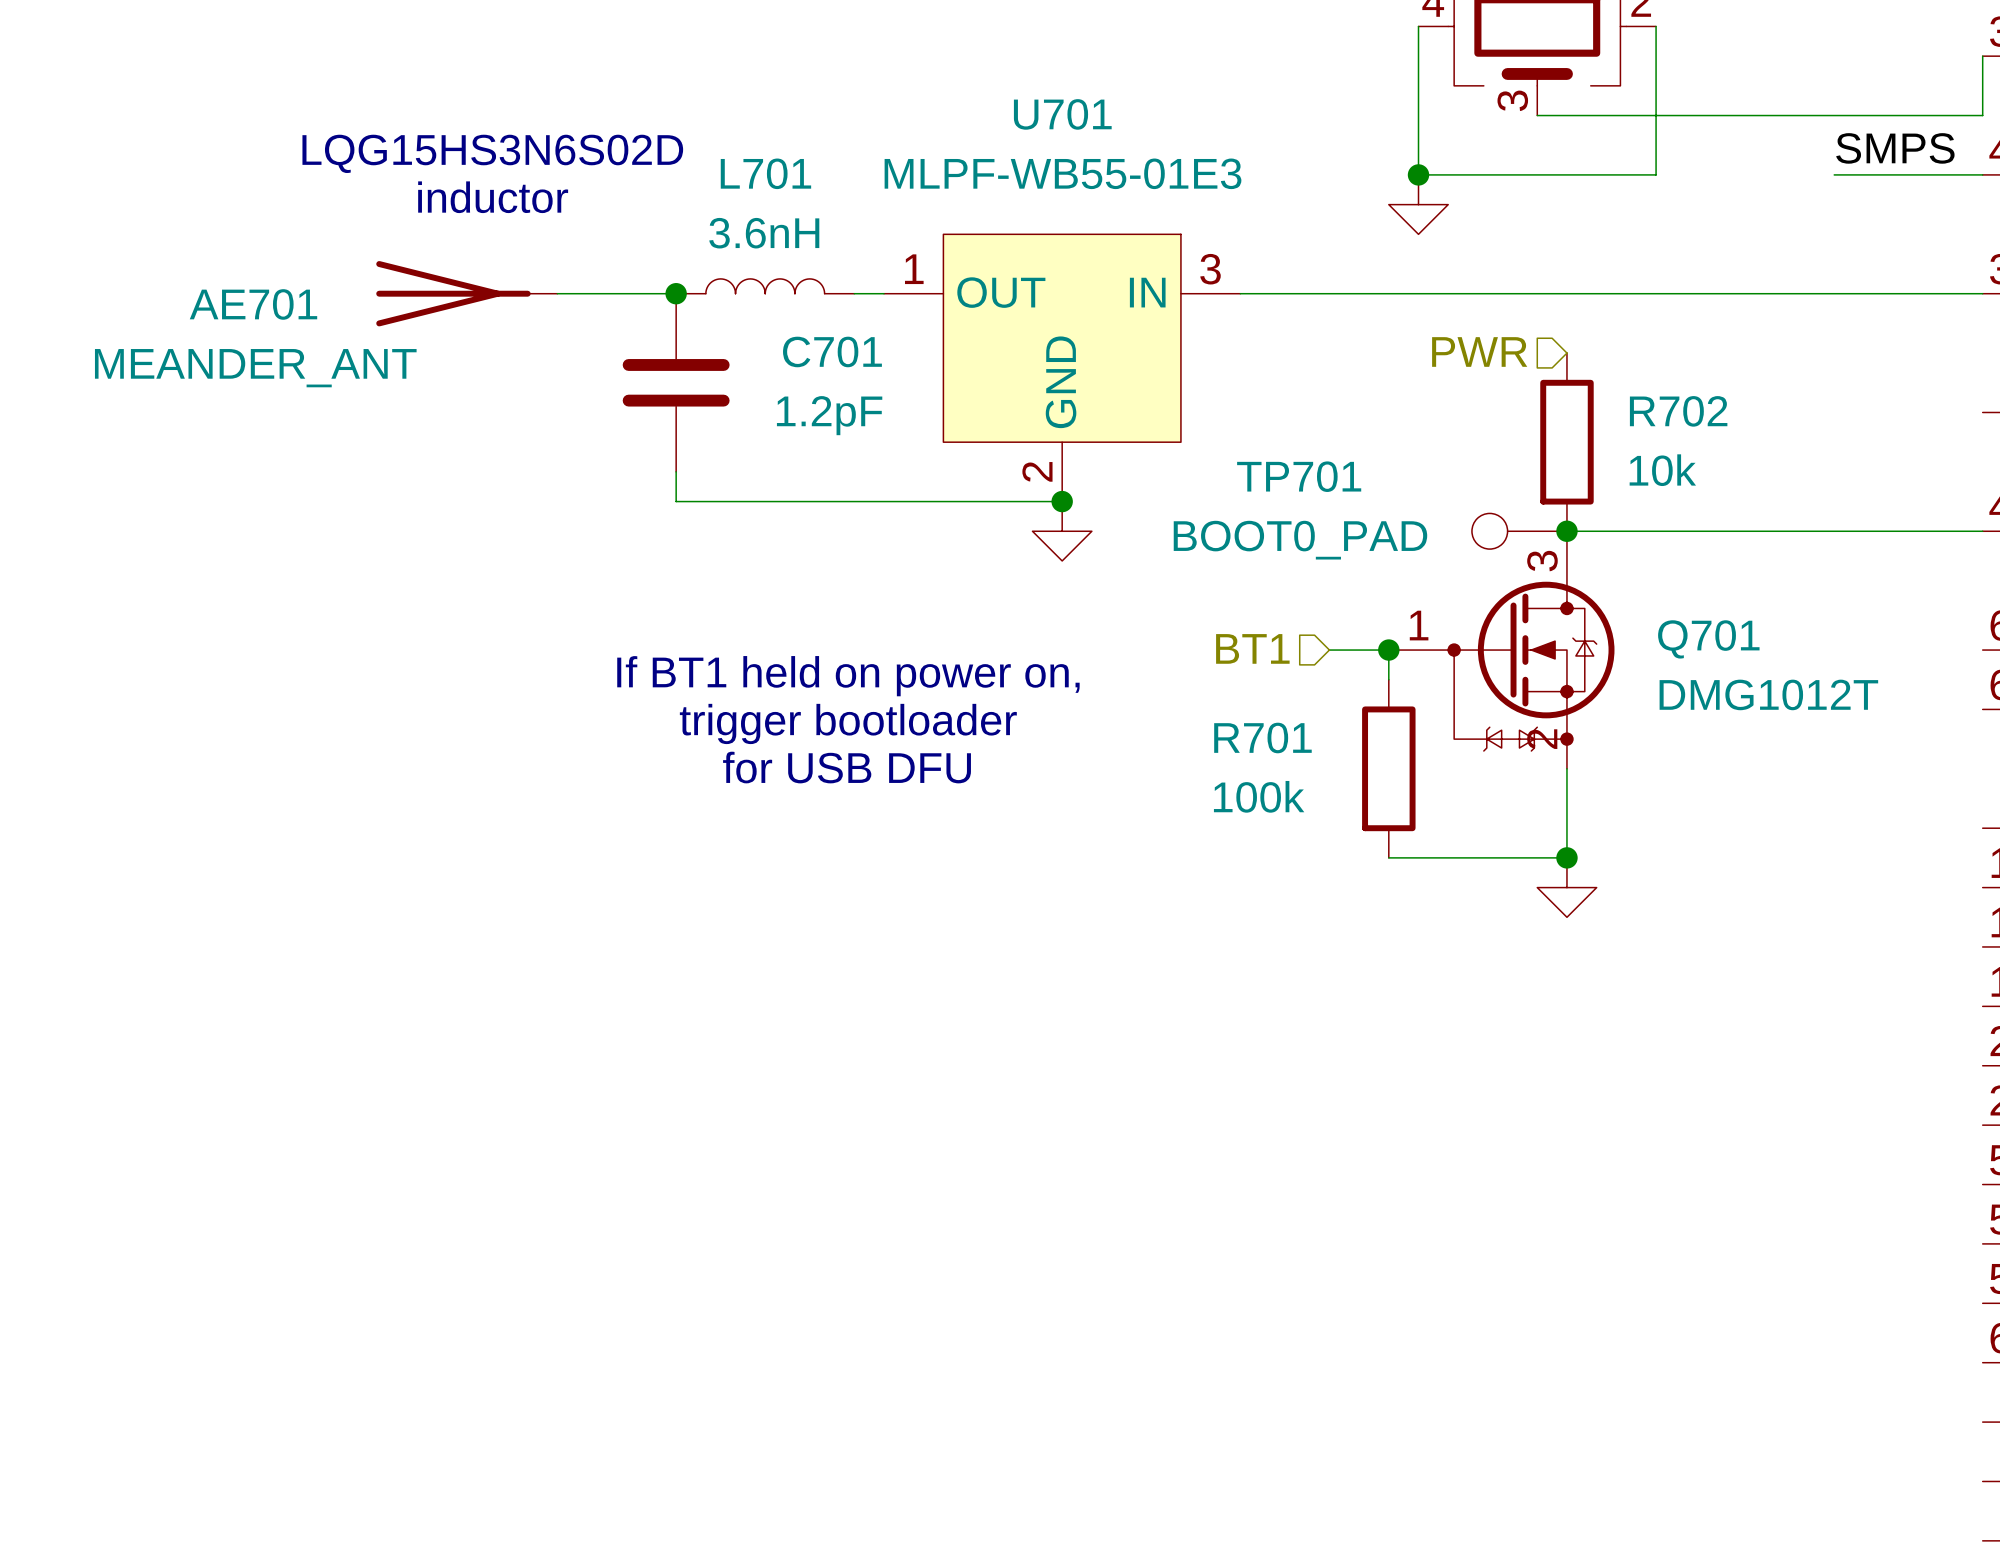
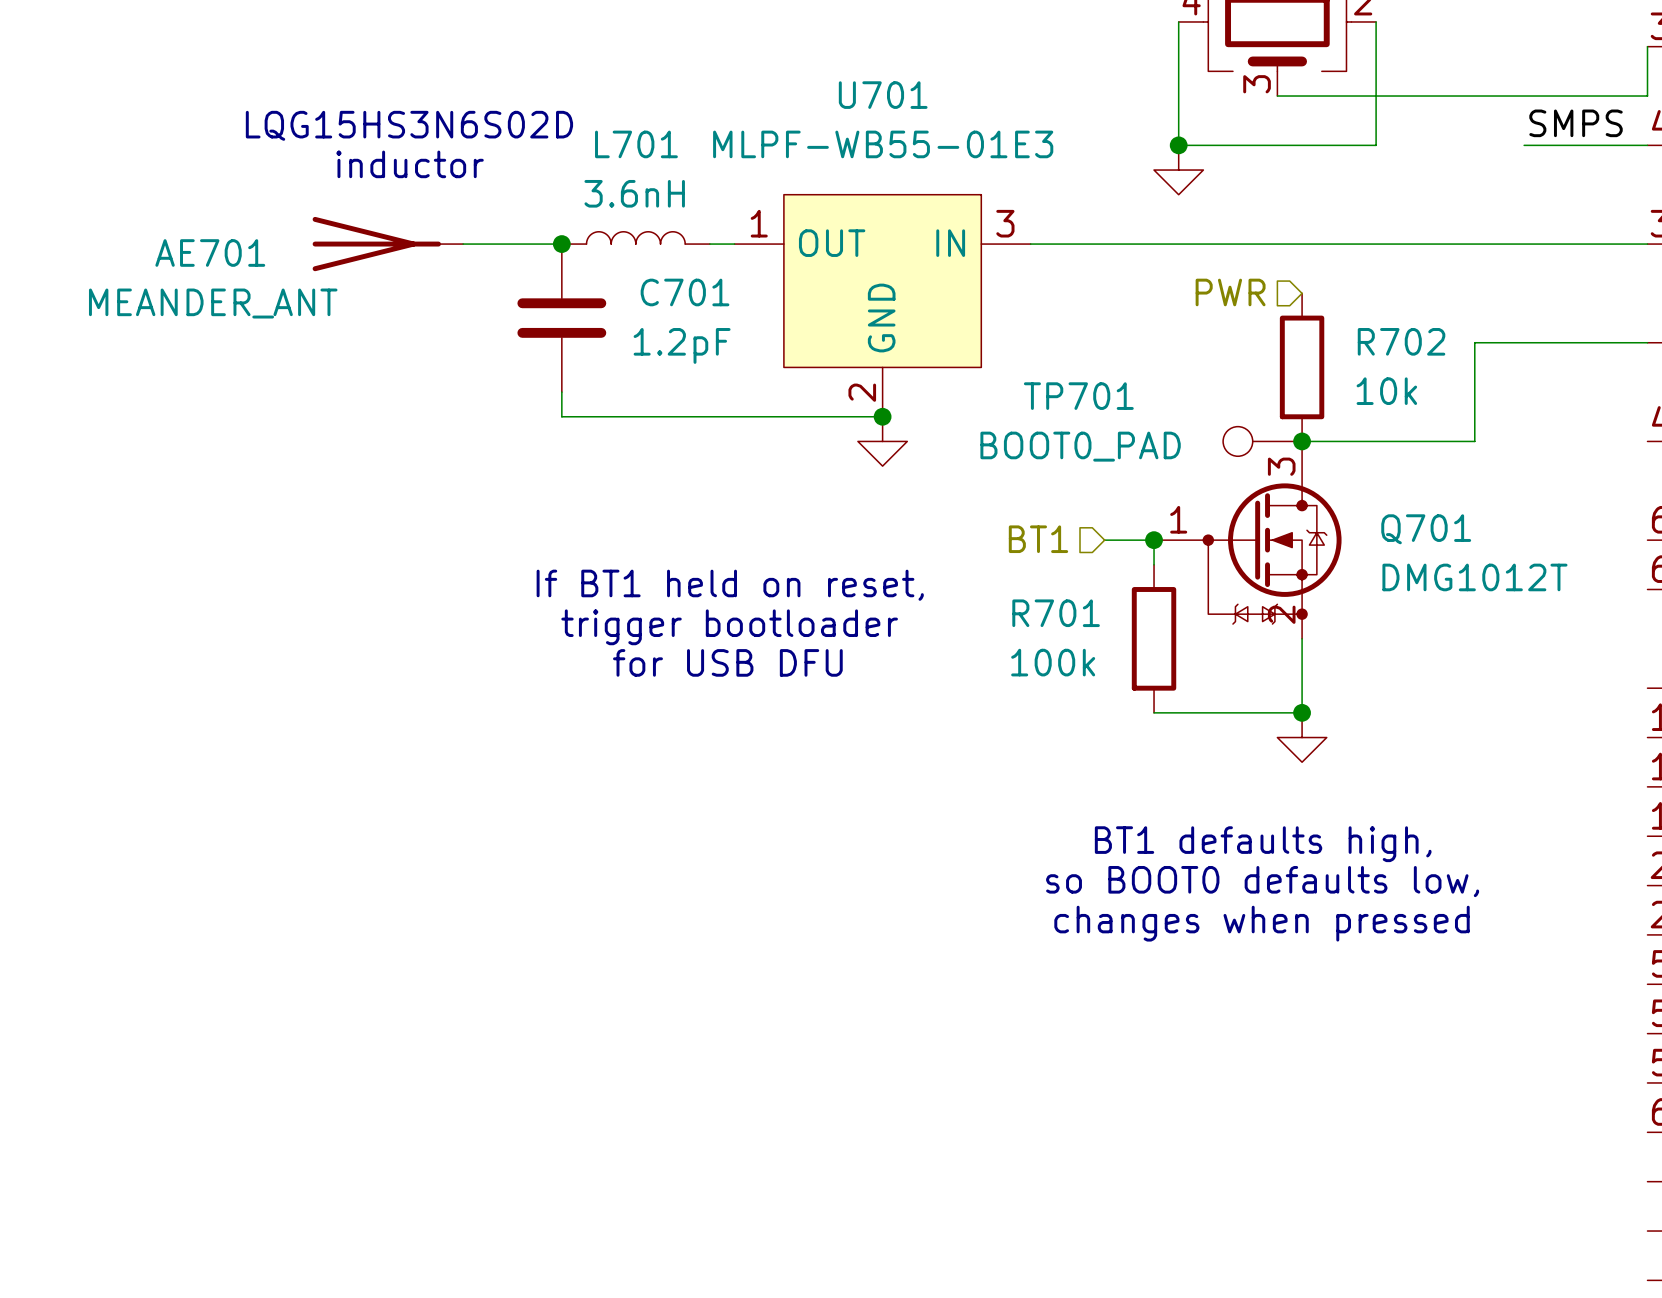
wire: (1774, 531) (1982, 531) -> (1474, 441) (1474, 342) (1647, 342)
text: If BT1 held on power on, (848, 676) -> If BT1 held on reset, (730, 585)
text position: trigger bootloader (848, 723) -> trigger bootloader (729, 627)
text position: for USB DFU (847, 767) -> for USB DFU (727, 662)
text: none -> BT1 defaults high, (1263, 844)
text: none -> so BOOT0 defaults low, (1262, 881)
text: none -> changes when pressed (1262, 923)

